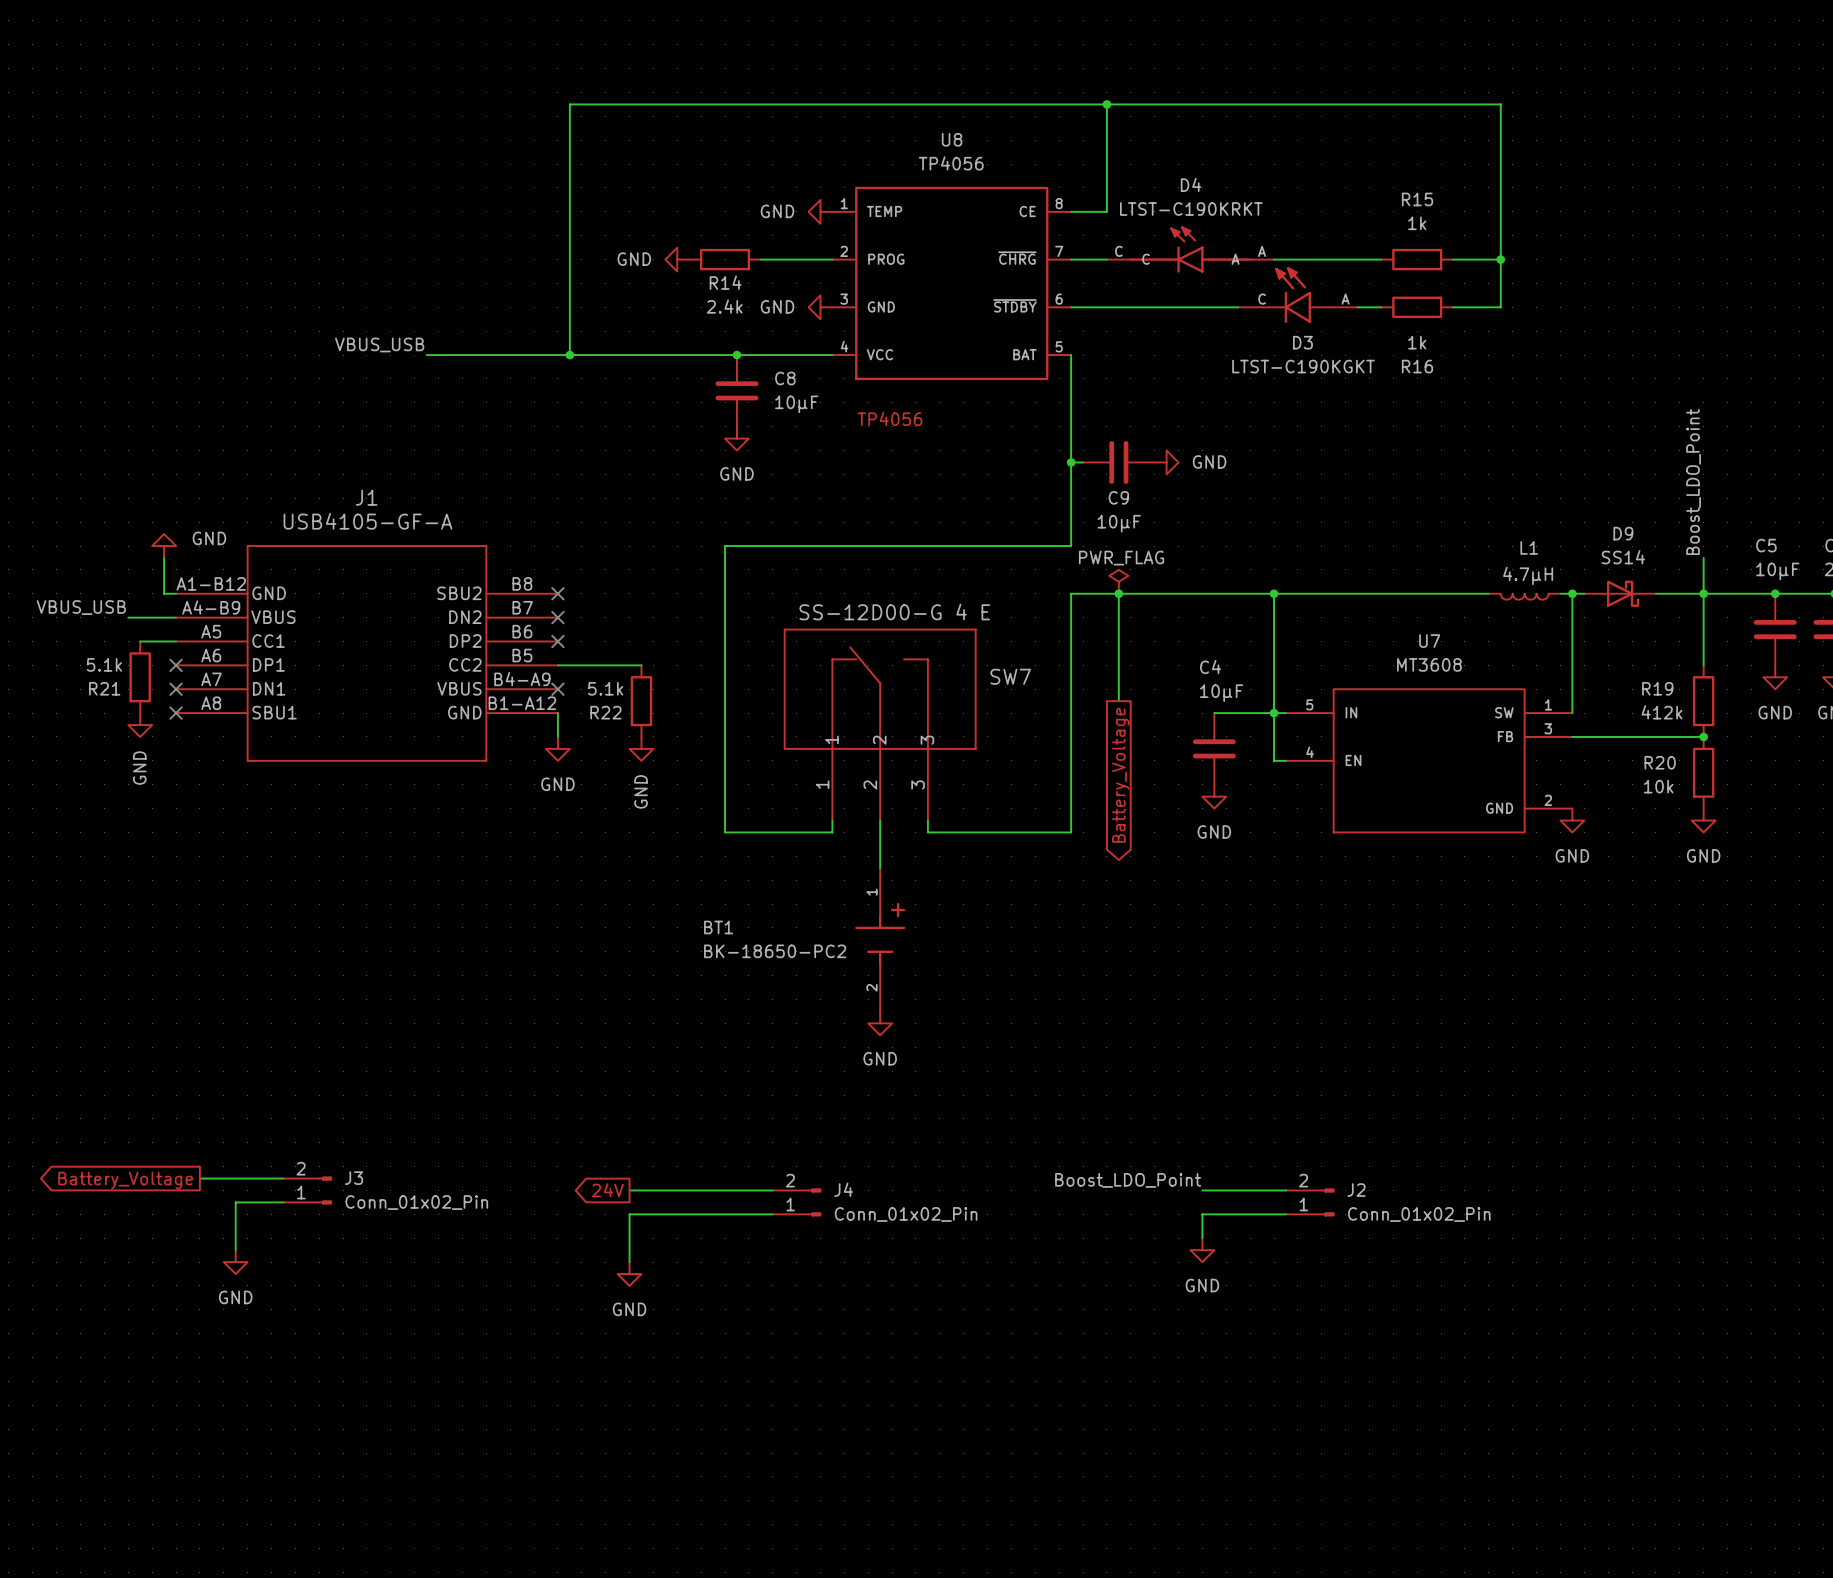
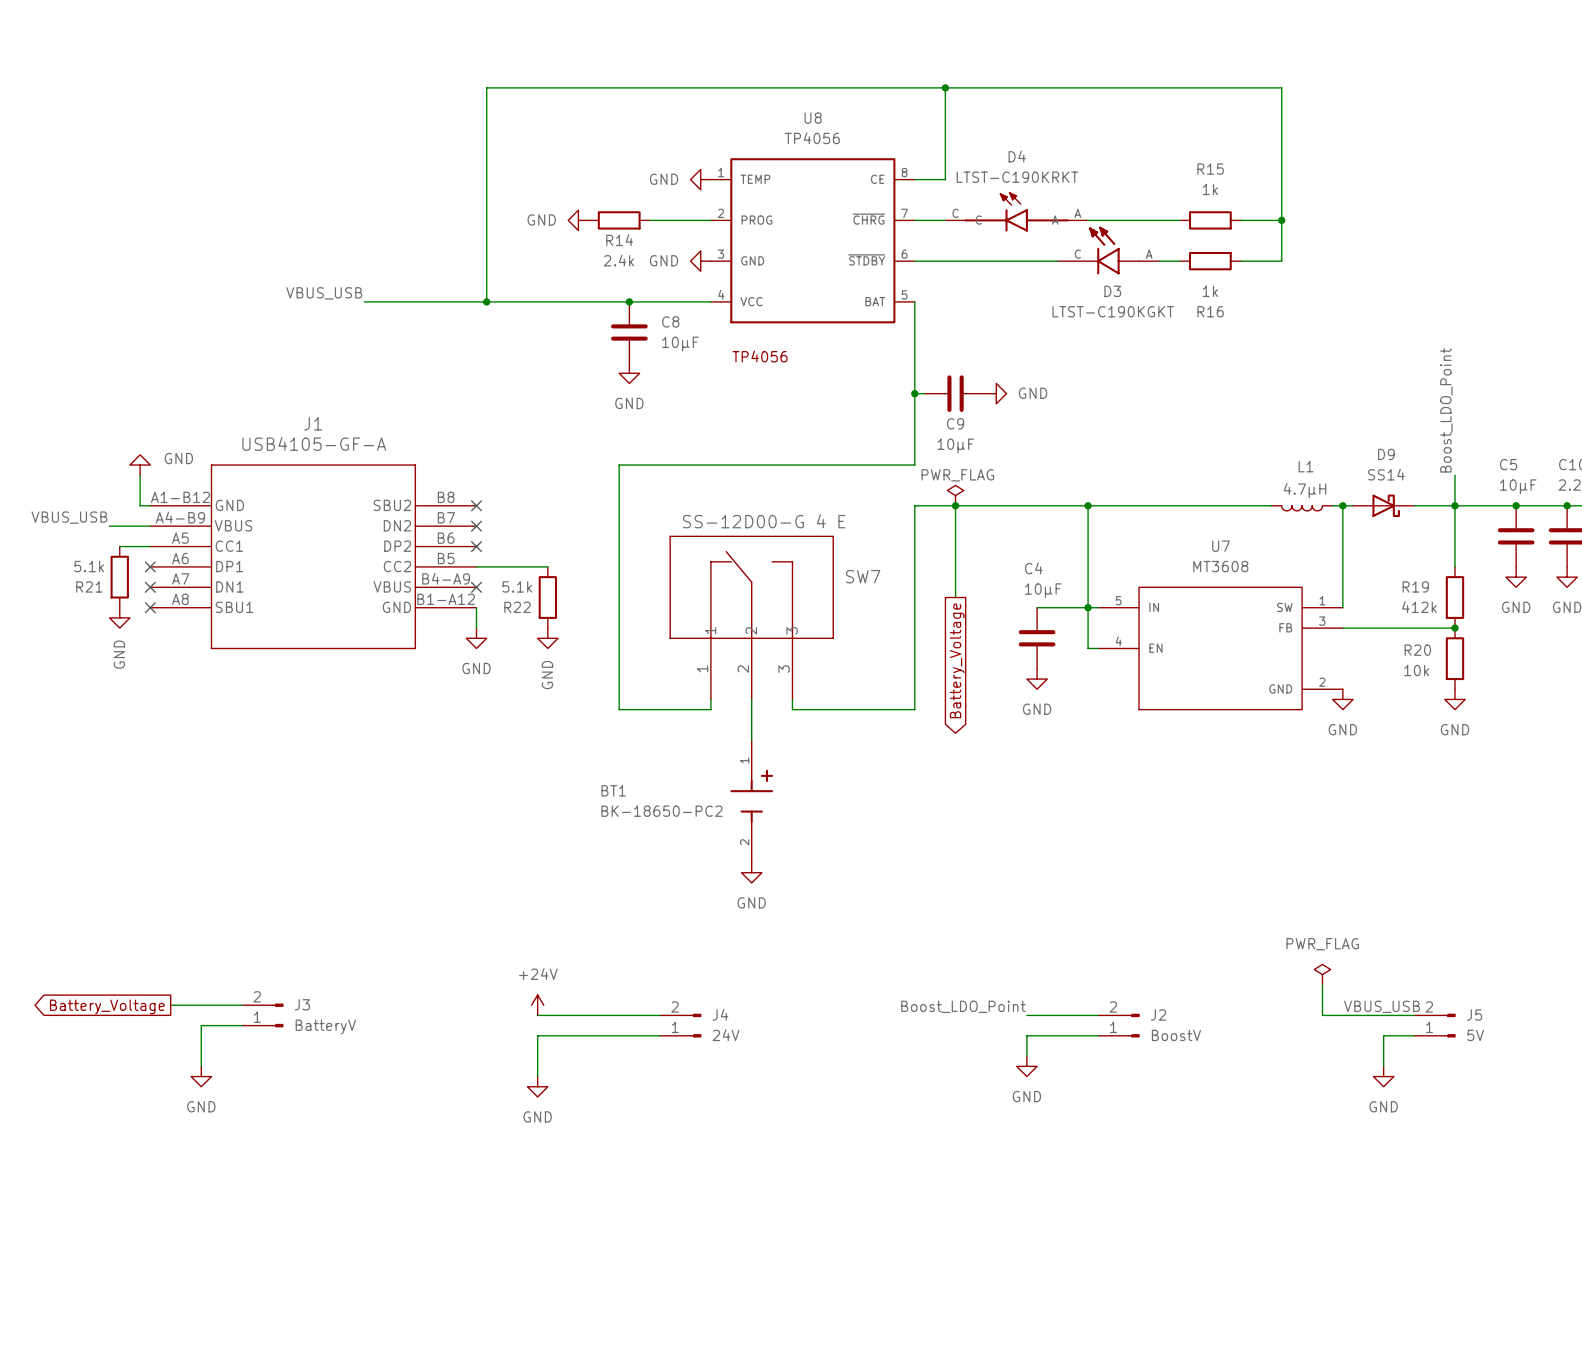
power symbol: none -> PWR_FLAG (1322, 974)
wire: none -> (1322, 984) (1322, 1015) (1414, 1015)
power symbol: none -> +24V (537, 1005)
label: none -> VBUS_USB (1382, 1006)
global label: 24V (607, 1190) -> none
J3 value: Conn_01x02_Pin (416, 1202) -> BatteryV (325, 1026)
J5: none -> 5V (1434, 1025)
J4 value: Conn_01x02_Pin (906, 1214) -> 24V (726, 1035)
J2 value: Conn_01x02_Pin (1419, 1214) -> BoostV (1176, 1035)
wire: none -> (1414, 1035) (1383, 1035) (1383, 1066)
power symbol: none -> GND (1383, 1076)

